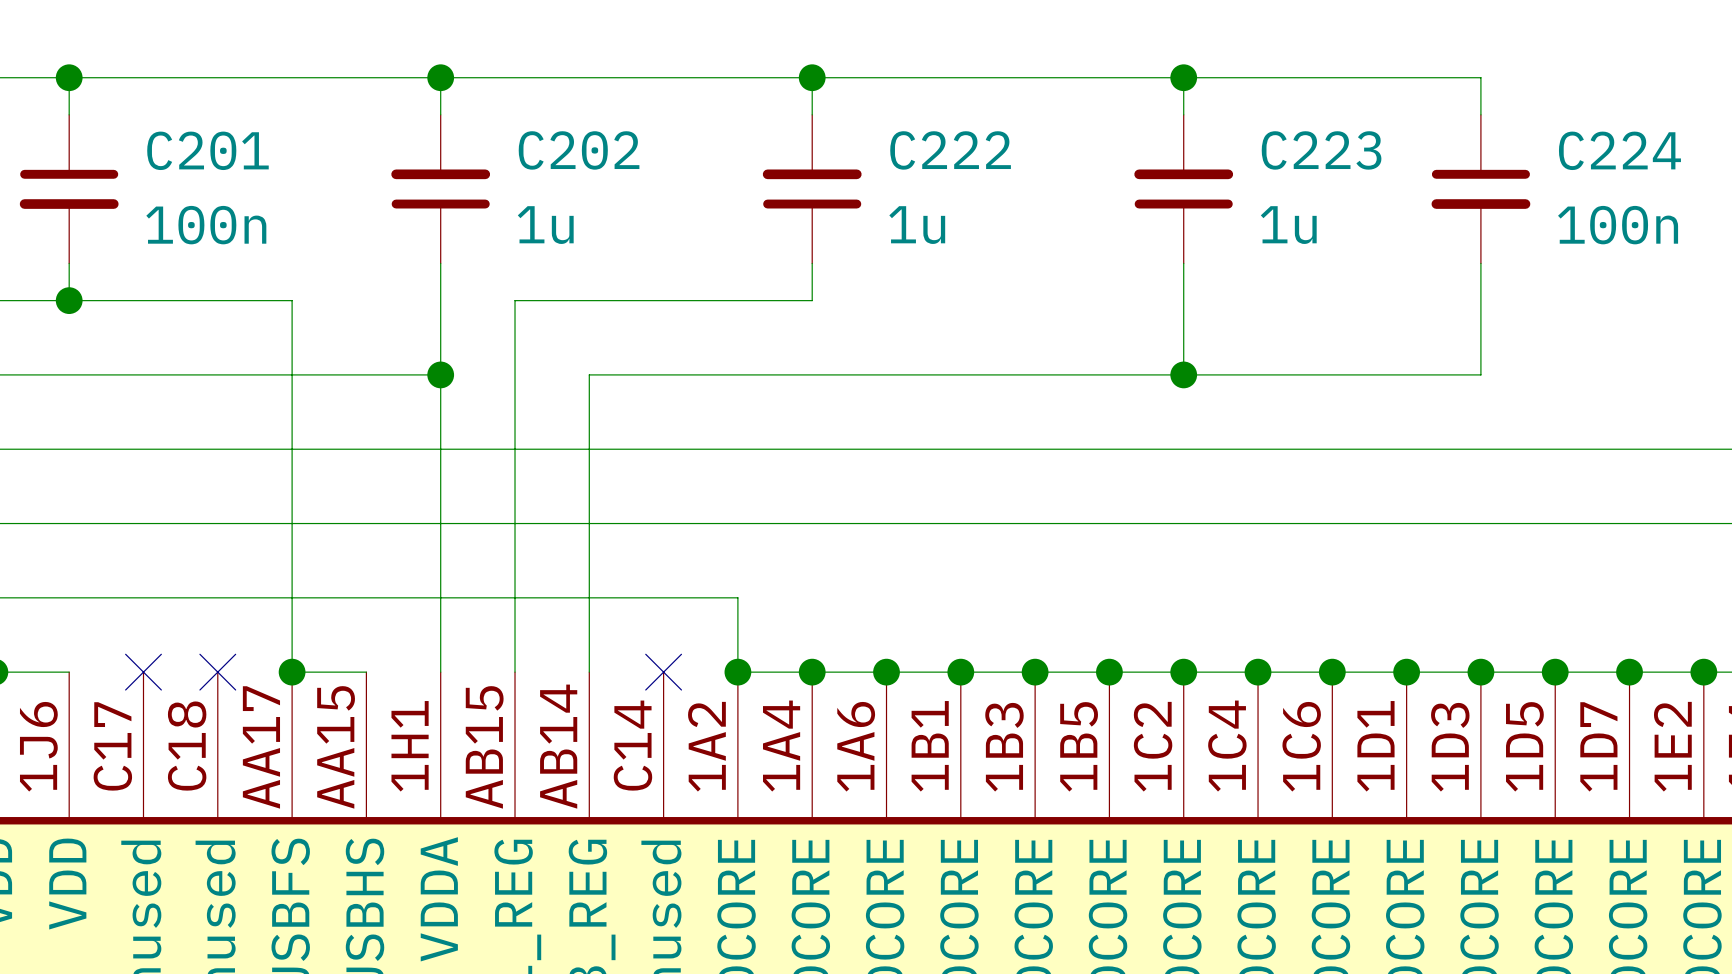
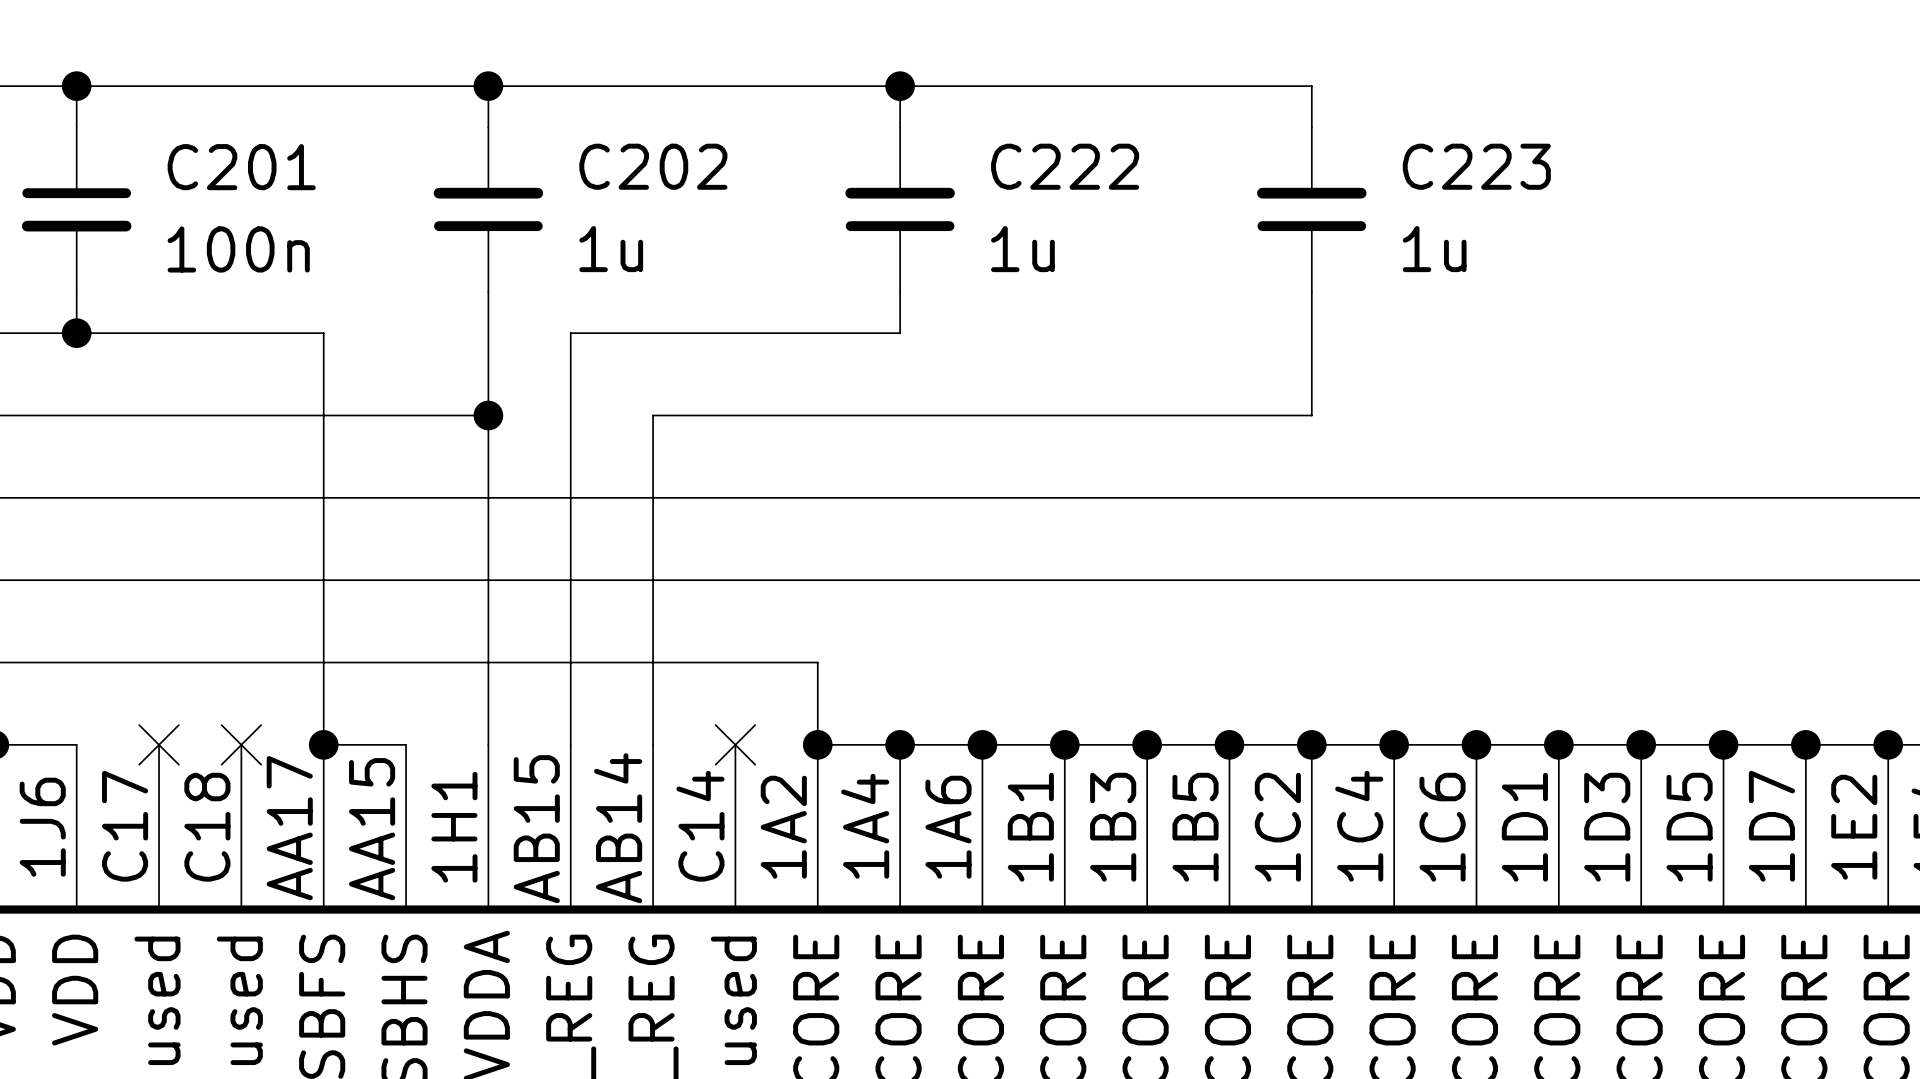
wire: (1183, 77) (1480, 77) (1480, 114) -> none
junction: (1183, 77) -> none
C224: 100n (1480, 189) -> none
wire: (1480, 263) (1480, 374) (1183, 374) -> none
junction: (1183, 374) -> none

